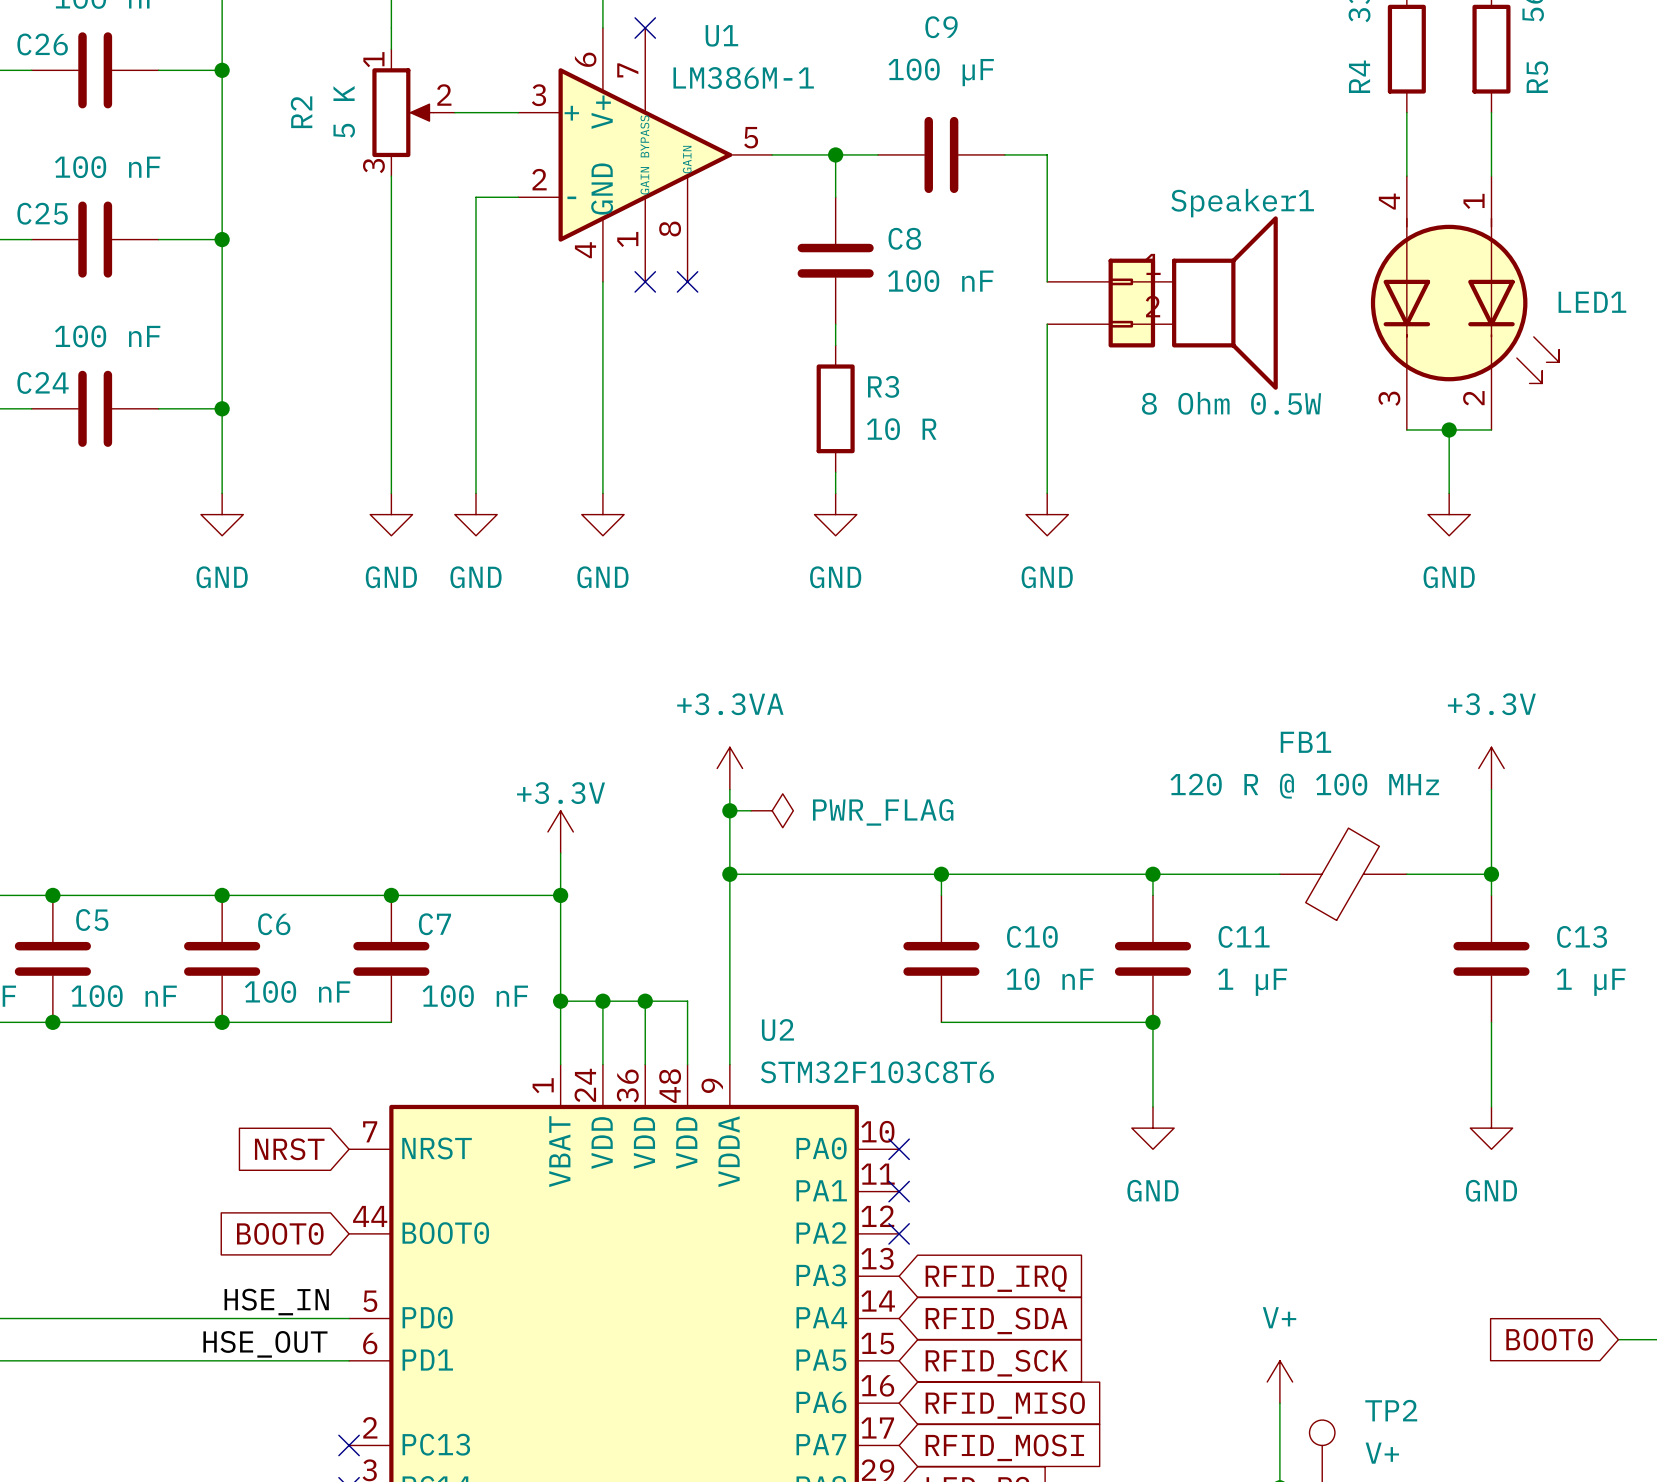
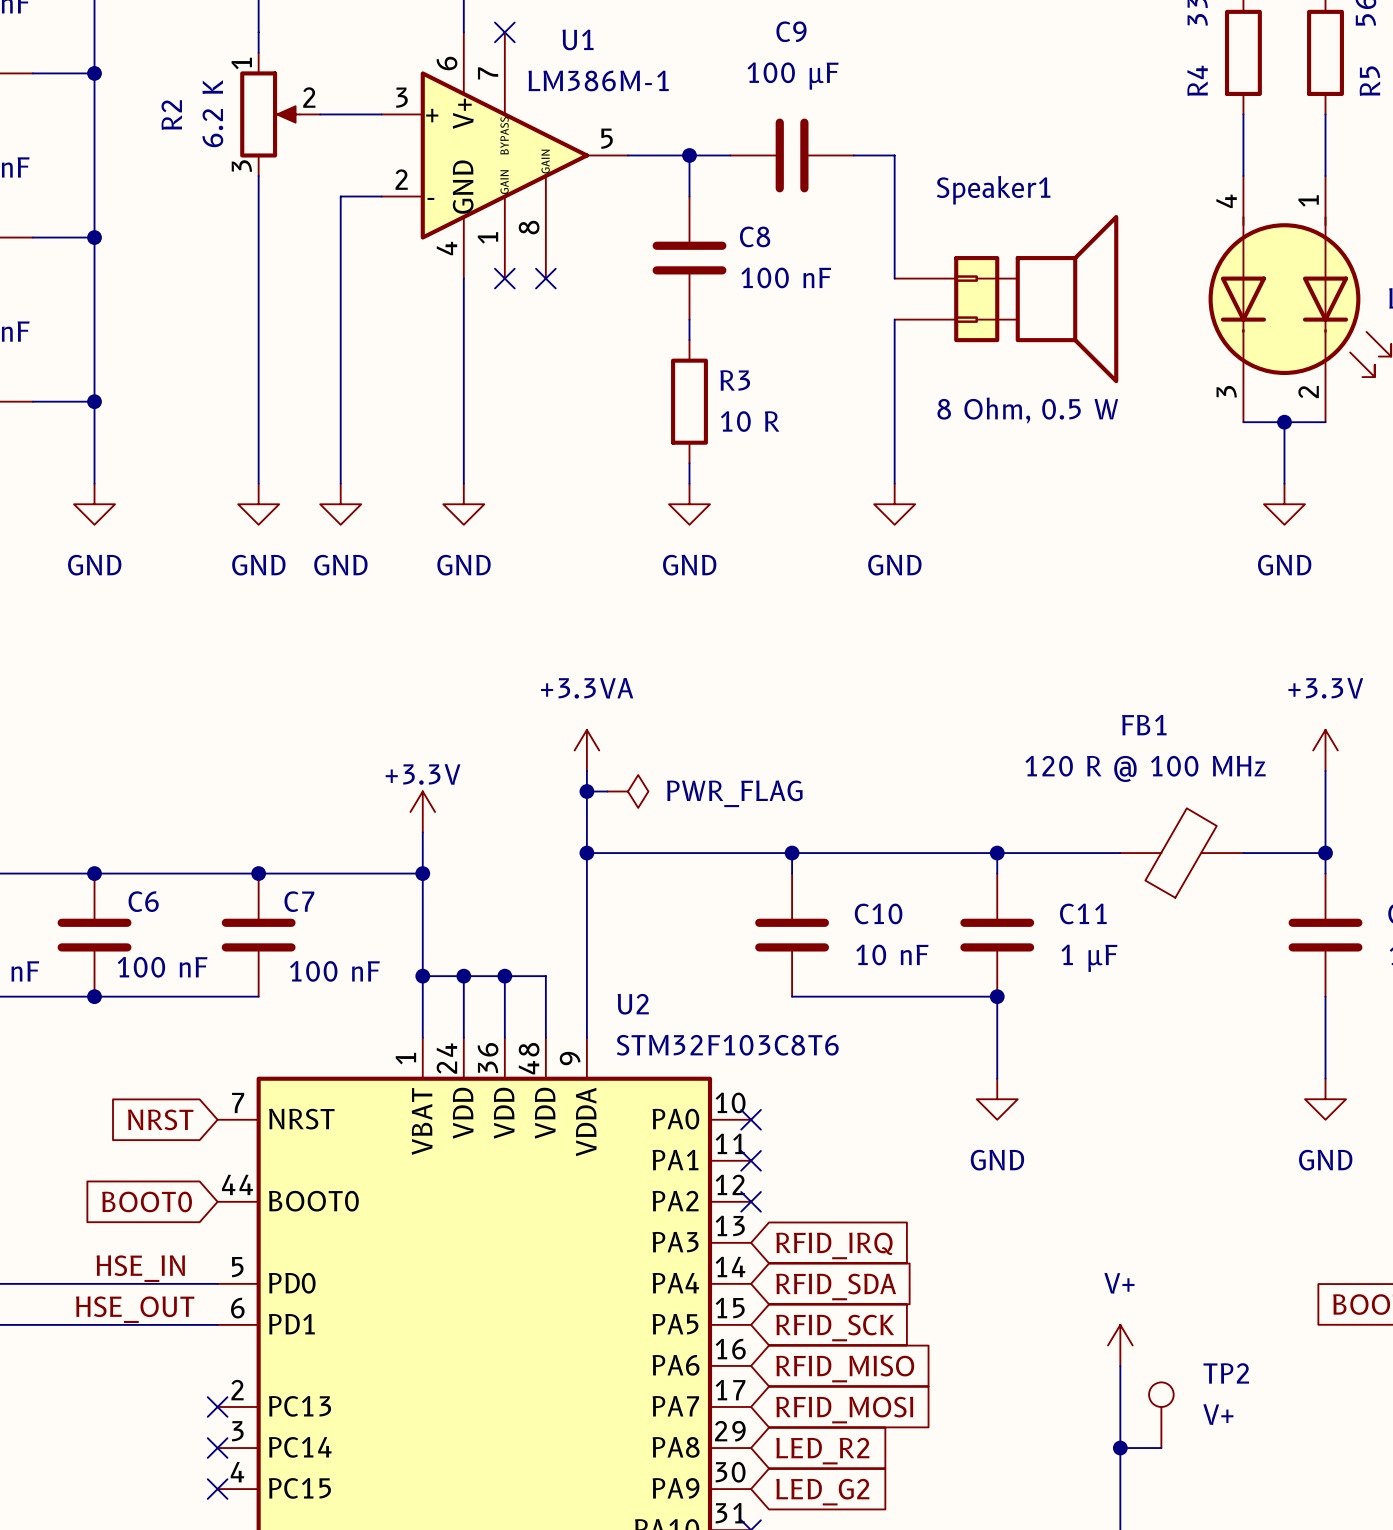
R2 value: 5 K (344, 111) -> 6.2 K (212, 113)
Speaker1 name position: Speaker1 (1242, 203) -> Speaker1 (993, 190)
Speaker1 symbol: [1131, 216, 1278, 390] -> [894, 214, 1119, 384]
part: (1101, 303) -> none
Speaker1 value: 8 Ohm 0.5W (1231, 403) -> 8 Ohm, 0.5 W (1027, 410)

